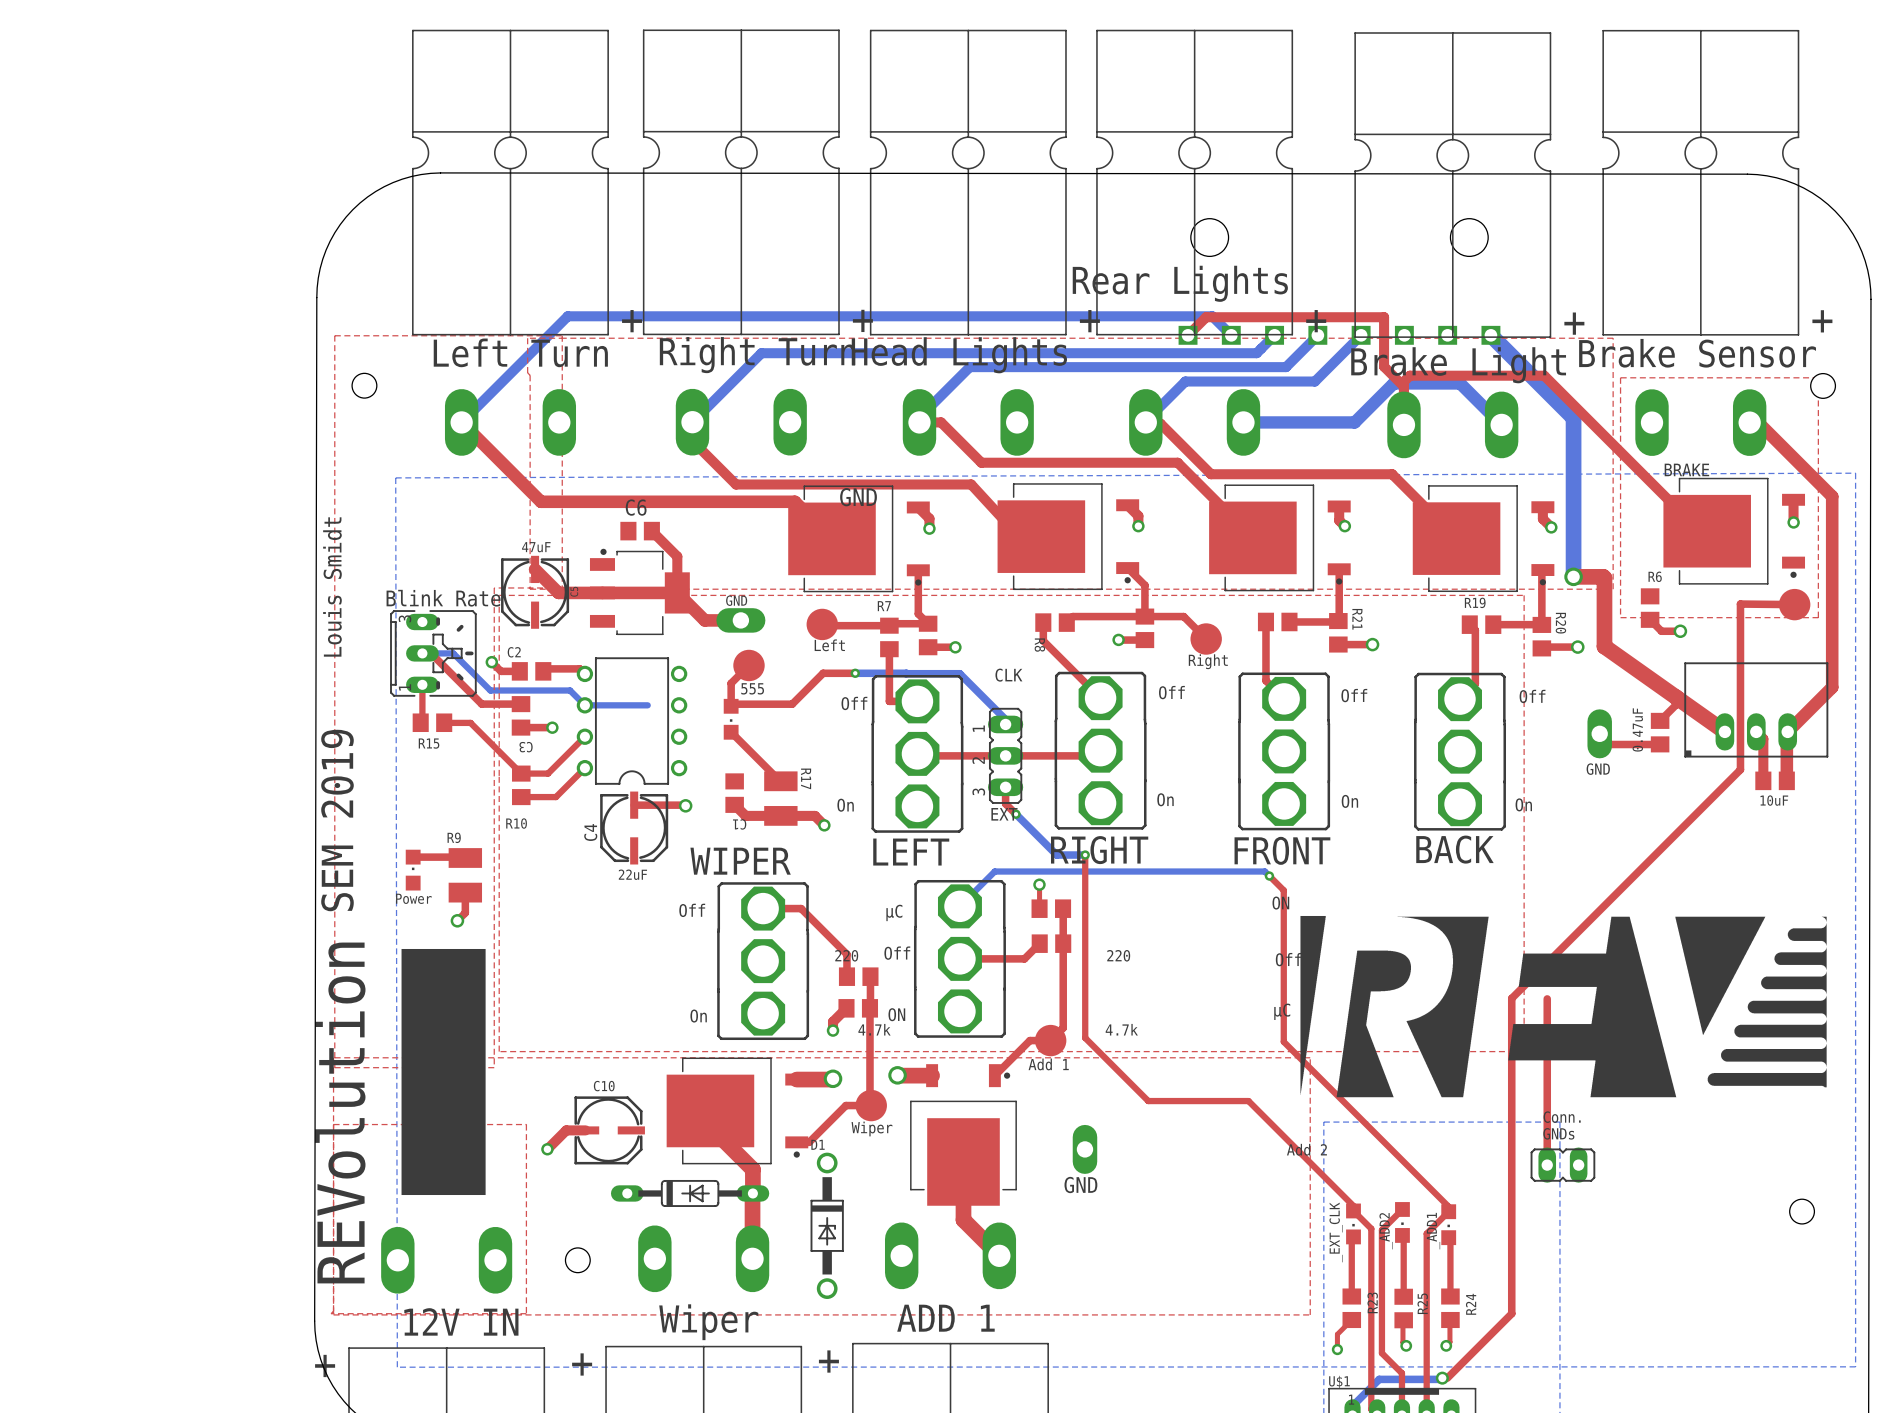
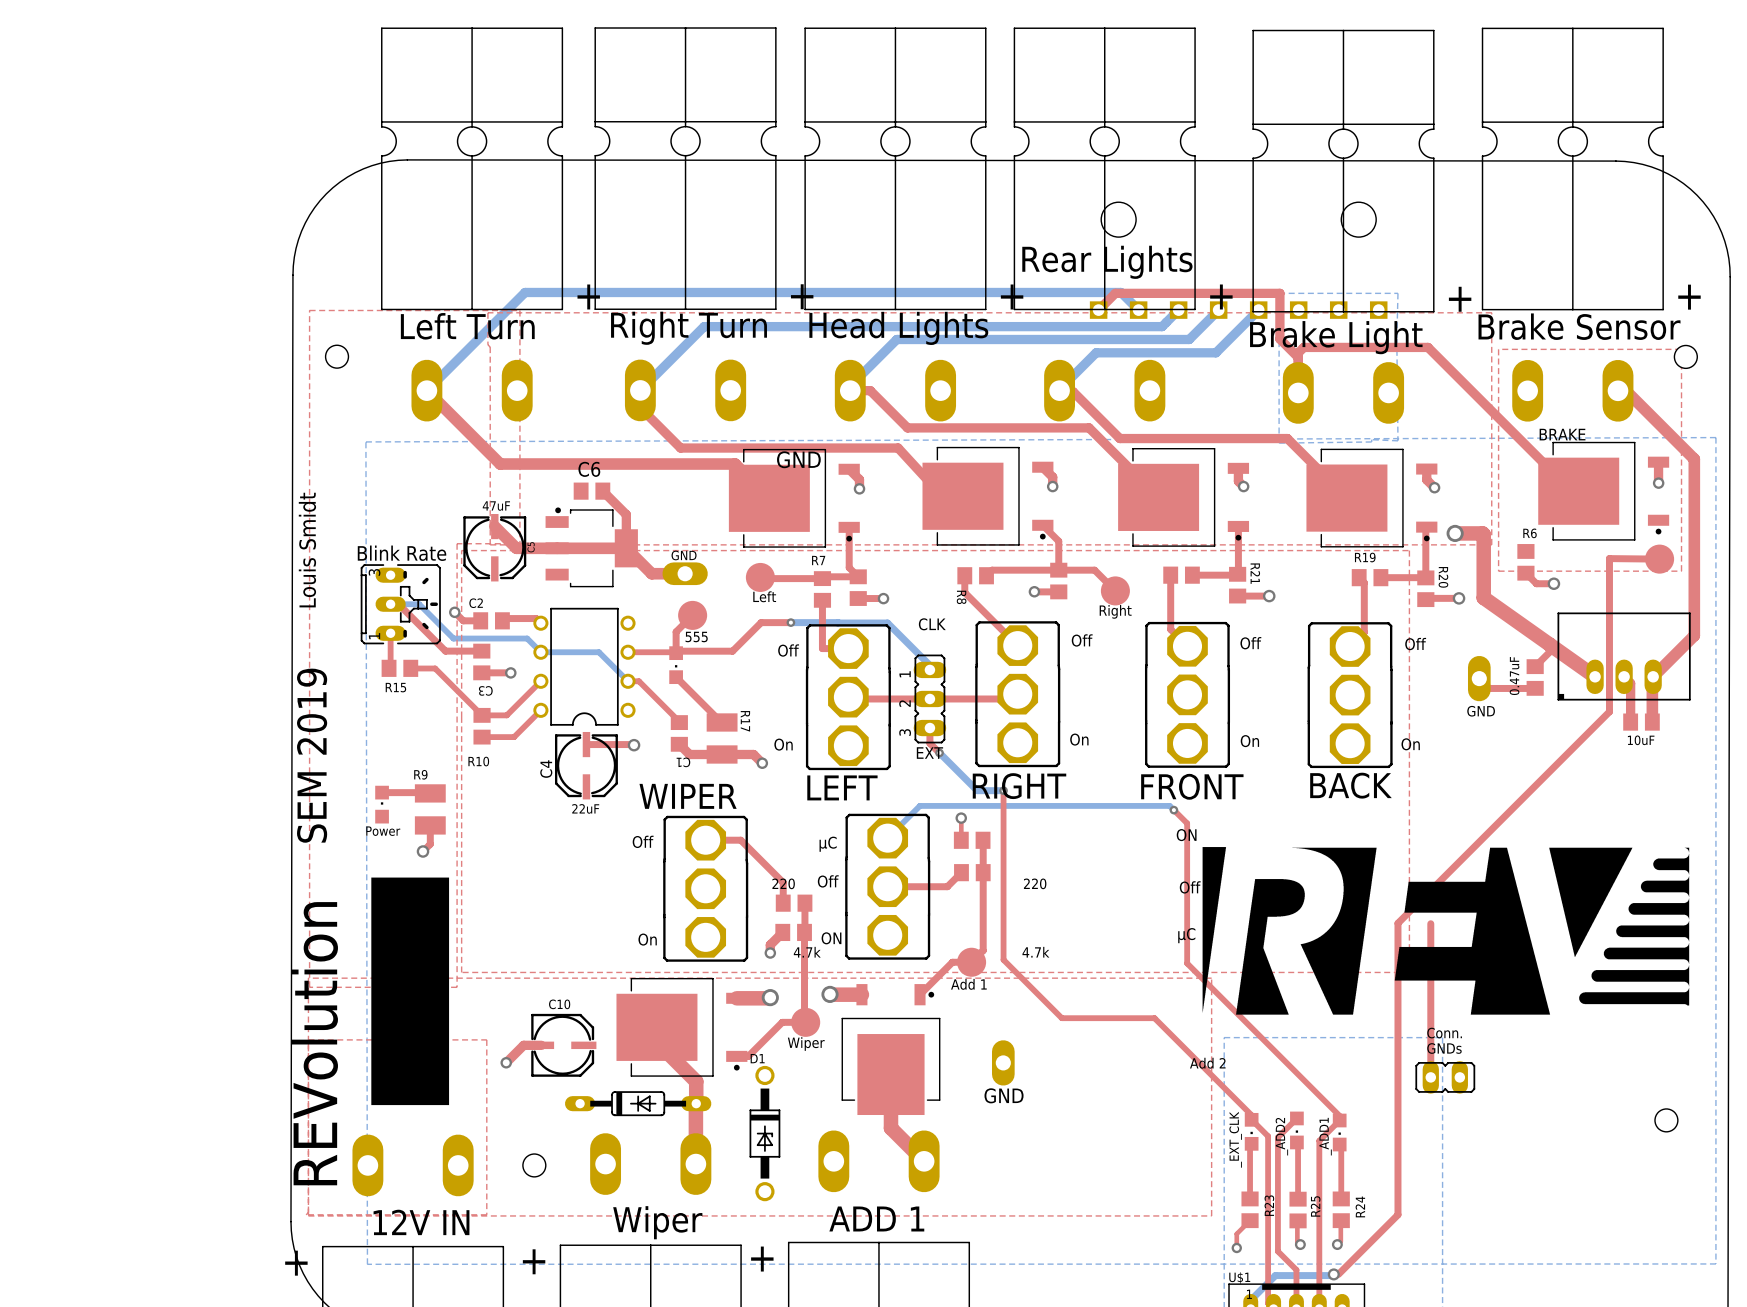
bottom zone outline: none -> (1279, 293) (1279, 443) (1371, 441) (1371, 439) (1397, 440) (1397, 293) (1279, 293)
bottom track: (1490, 335) (1573, 417) (1573, 576) -> none
bottom track: (1243, 422) (1354, 422) (1393, 383) (1460, 383) (1501, 424) -> none
bottom track: none -> (598, 652) (628, 681)
top track: none -> (628, 652) (675, 652)
top track: none -> (628, 681) (638, 681) (679, 722)

